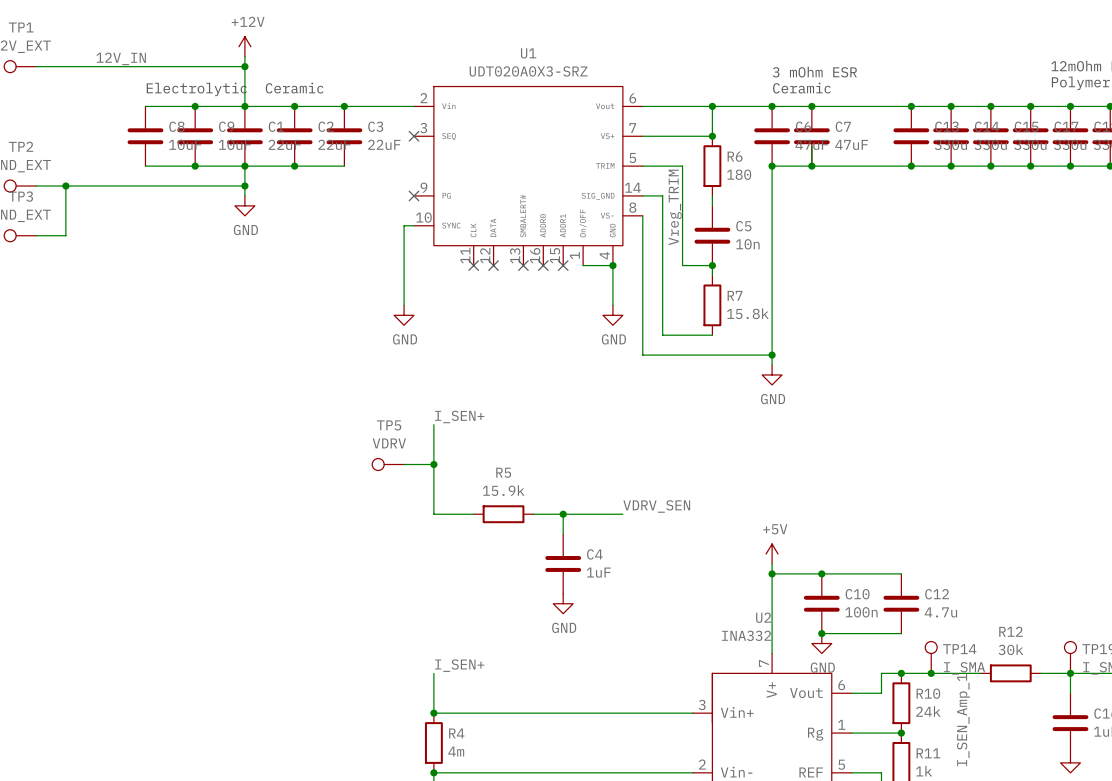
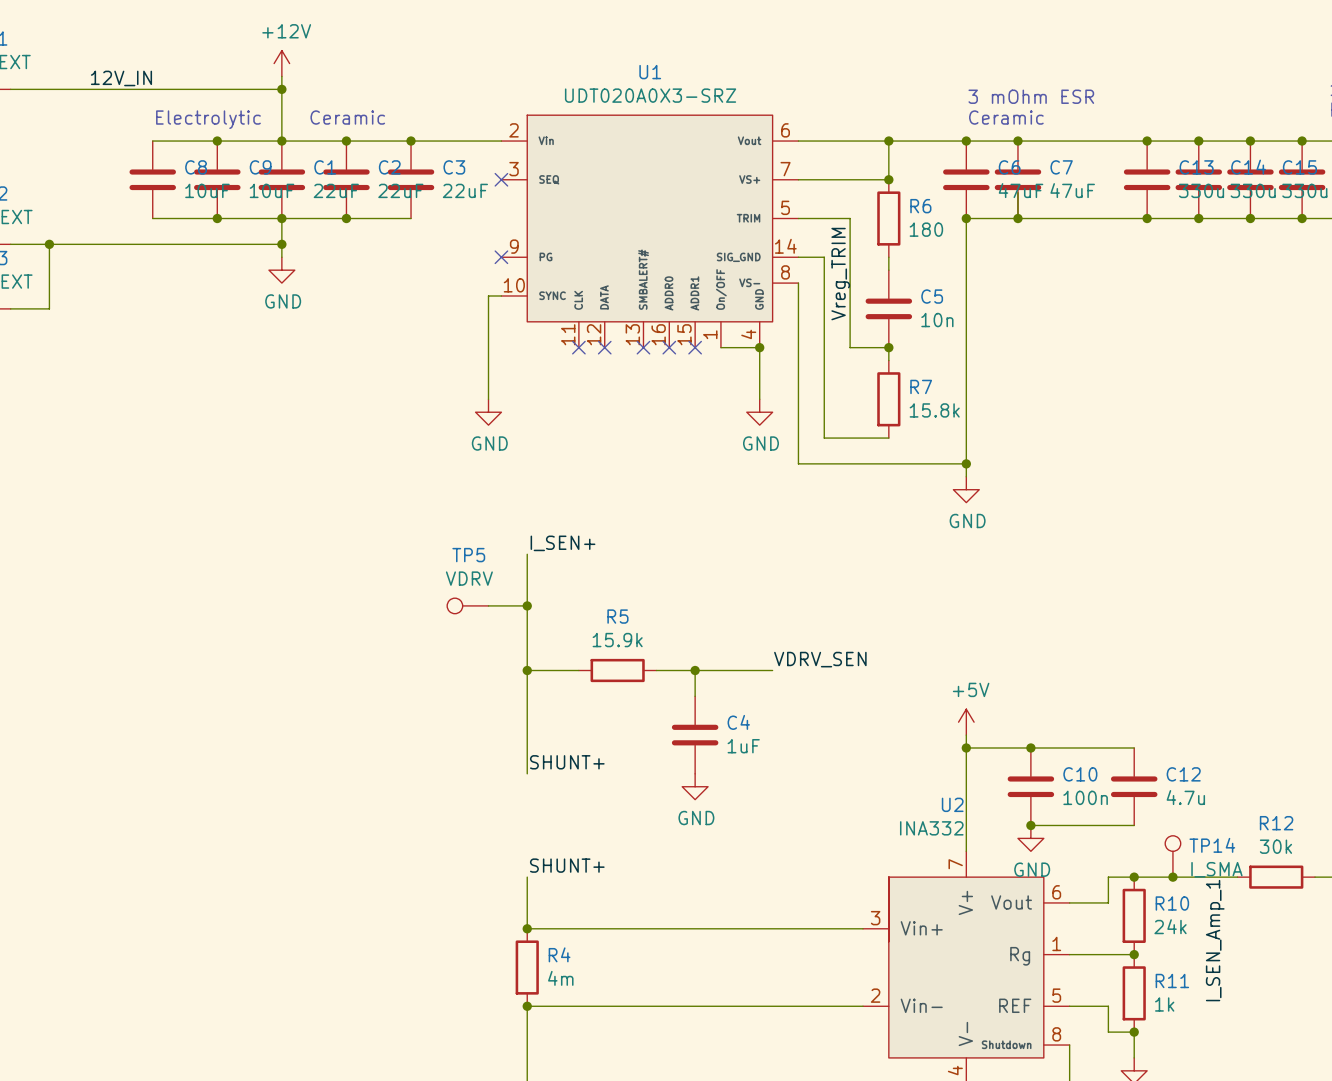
wire: none -> (527, 670) (527, 773)
junction: none -> (527, 670)
label: none -> SHUNT+ (567, 762)
label: I_SEN+ (459, 665) -> SHUNT+ (567, 865)

